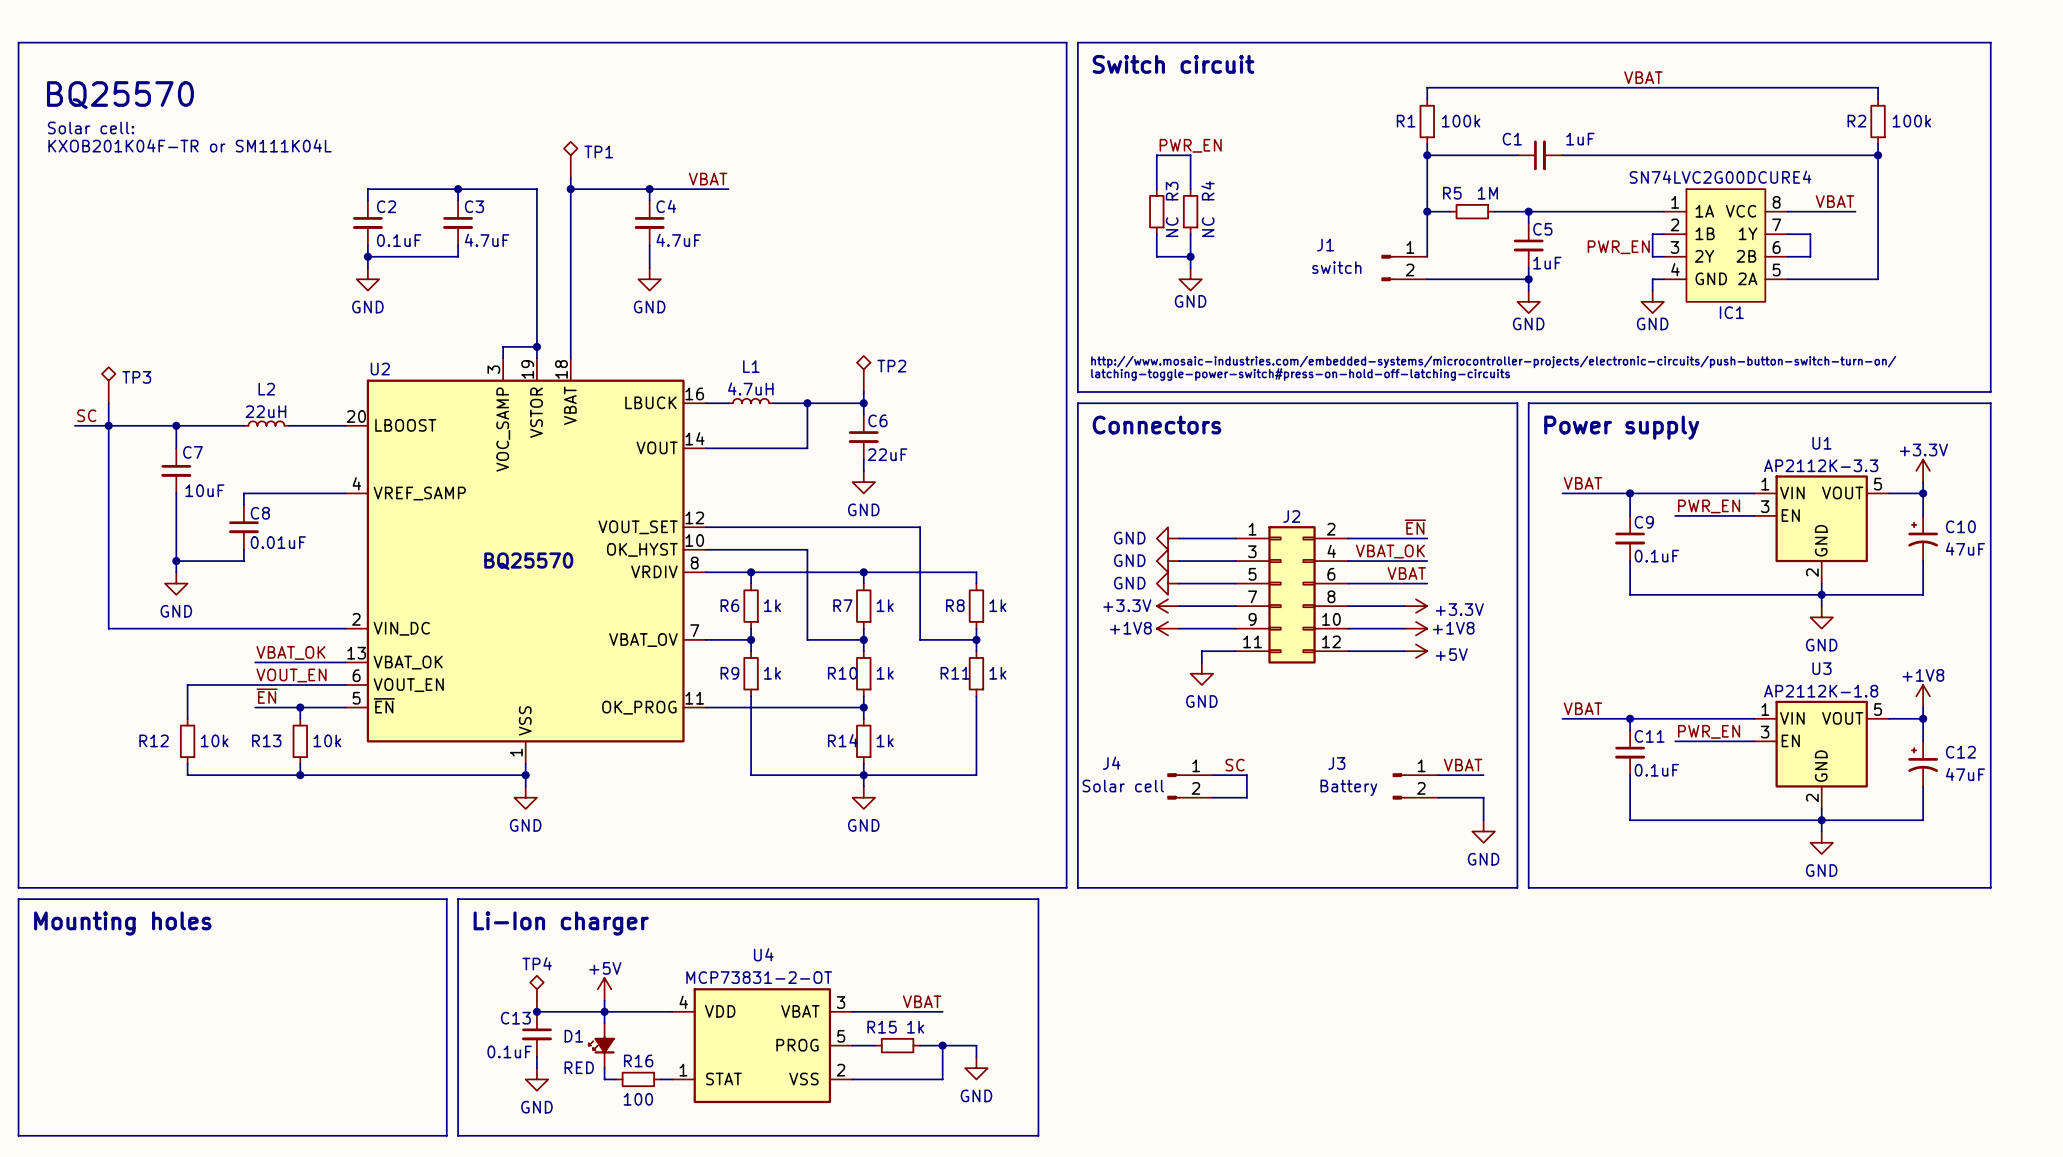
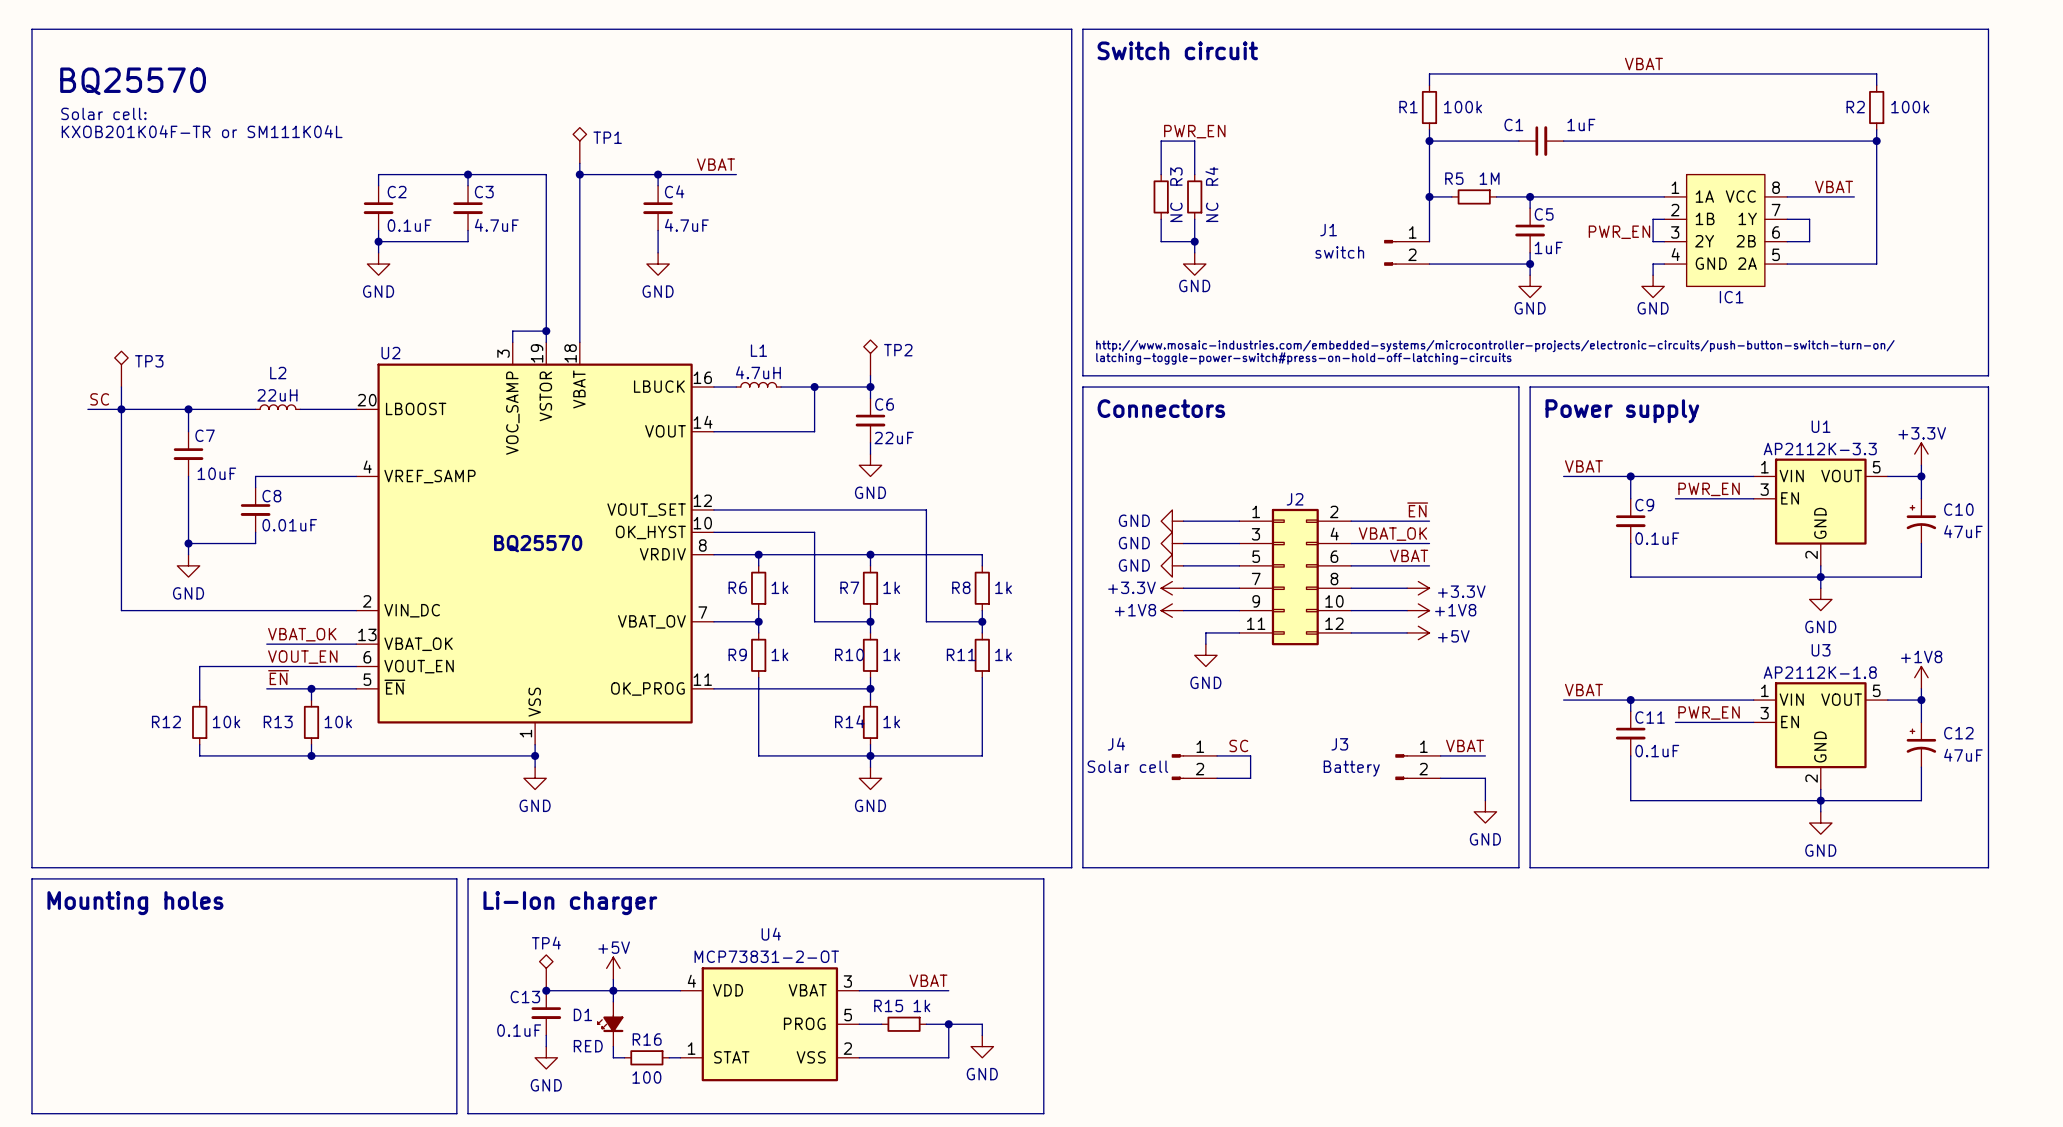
IC1 value: SN74LVC2G00DCURE4 (1720, 177) -> none

